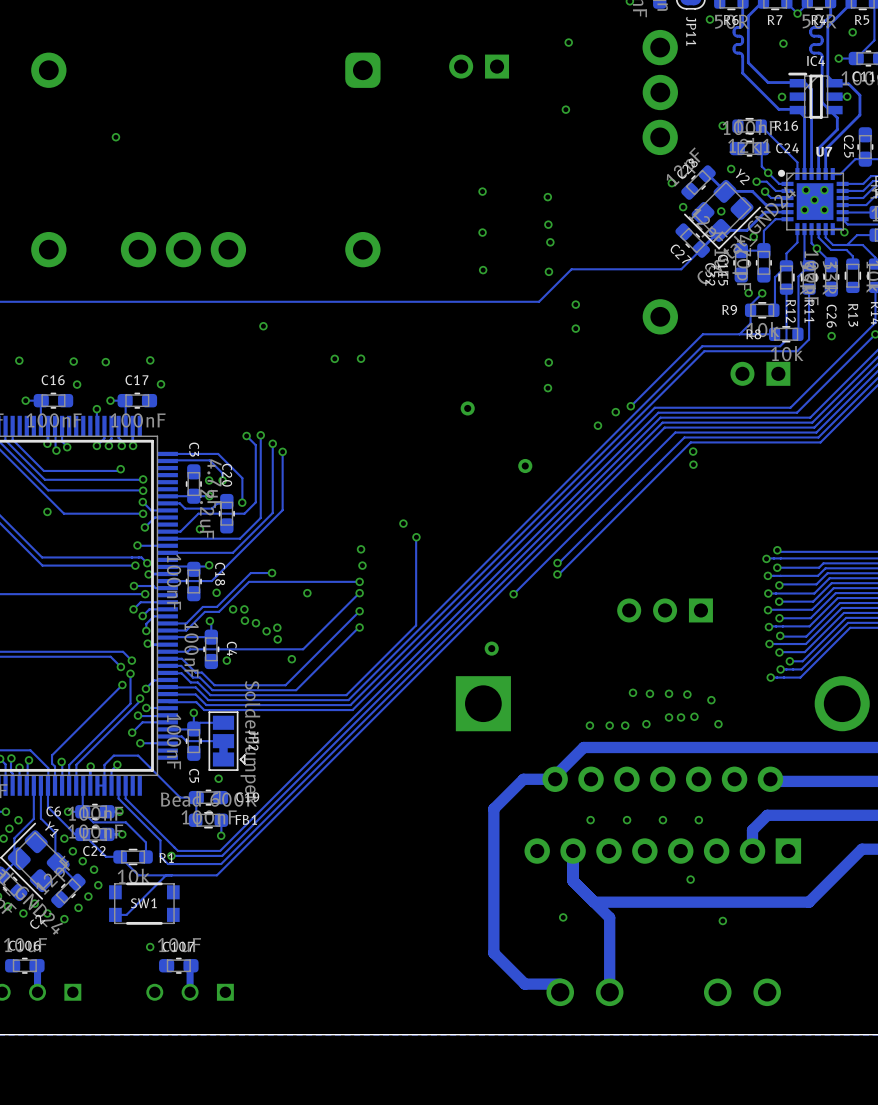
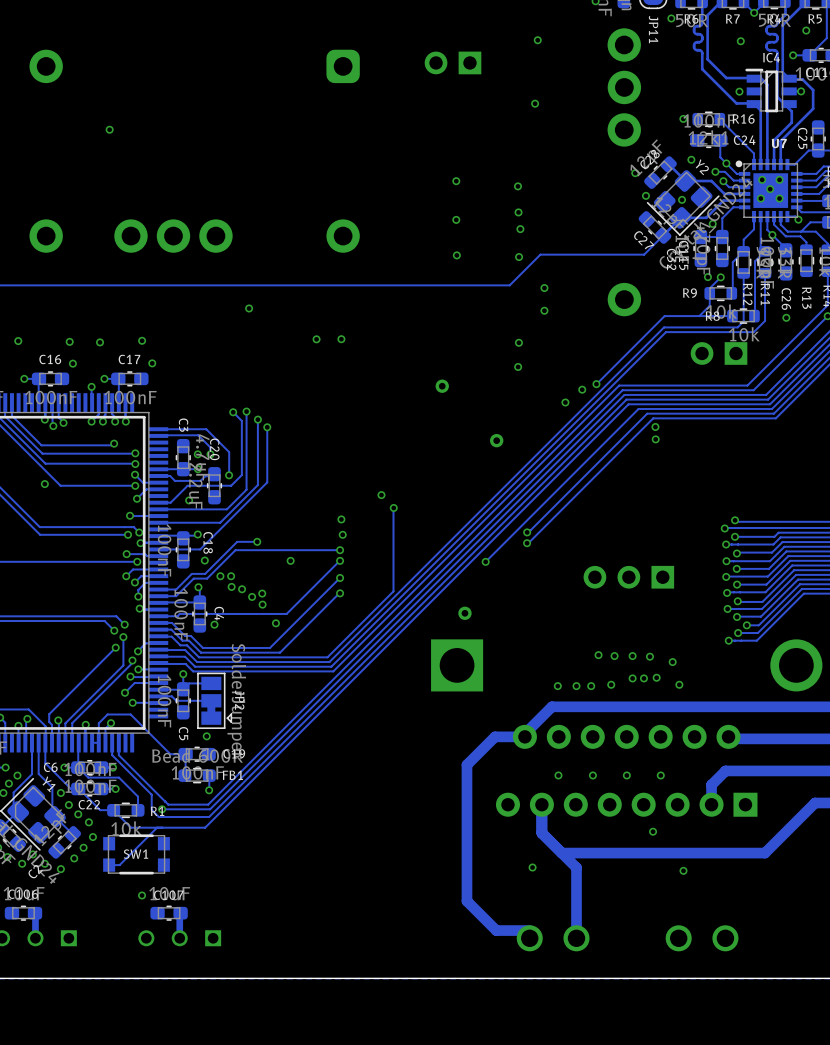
track: (11, 758) (12, 785) -> none
via: (11, 758) -> none

